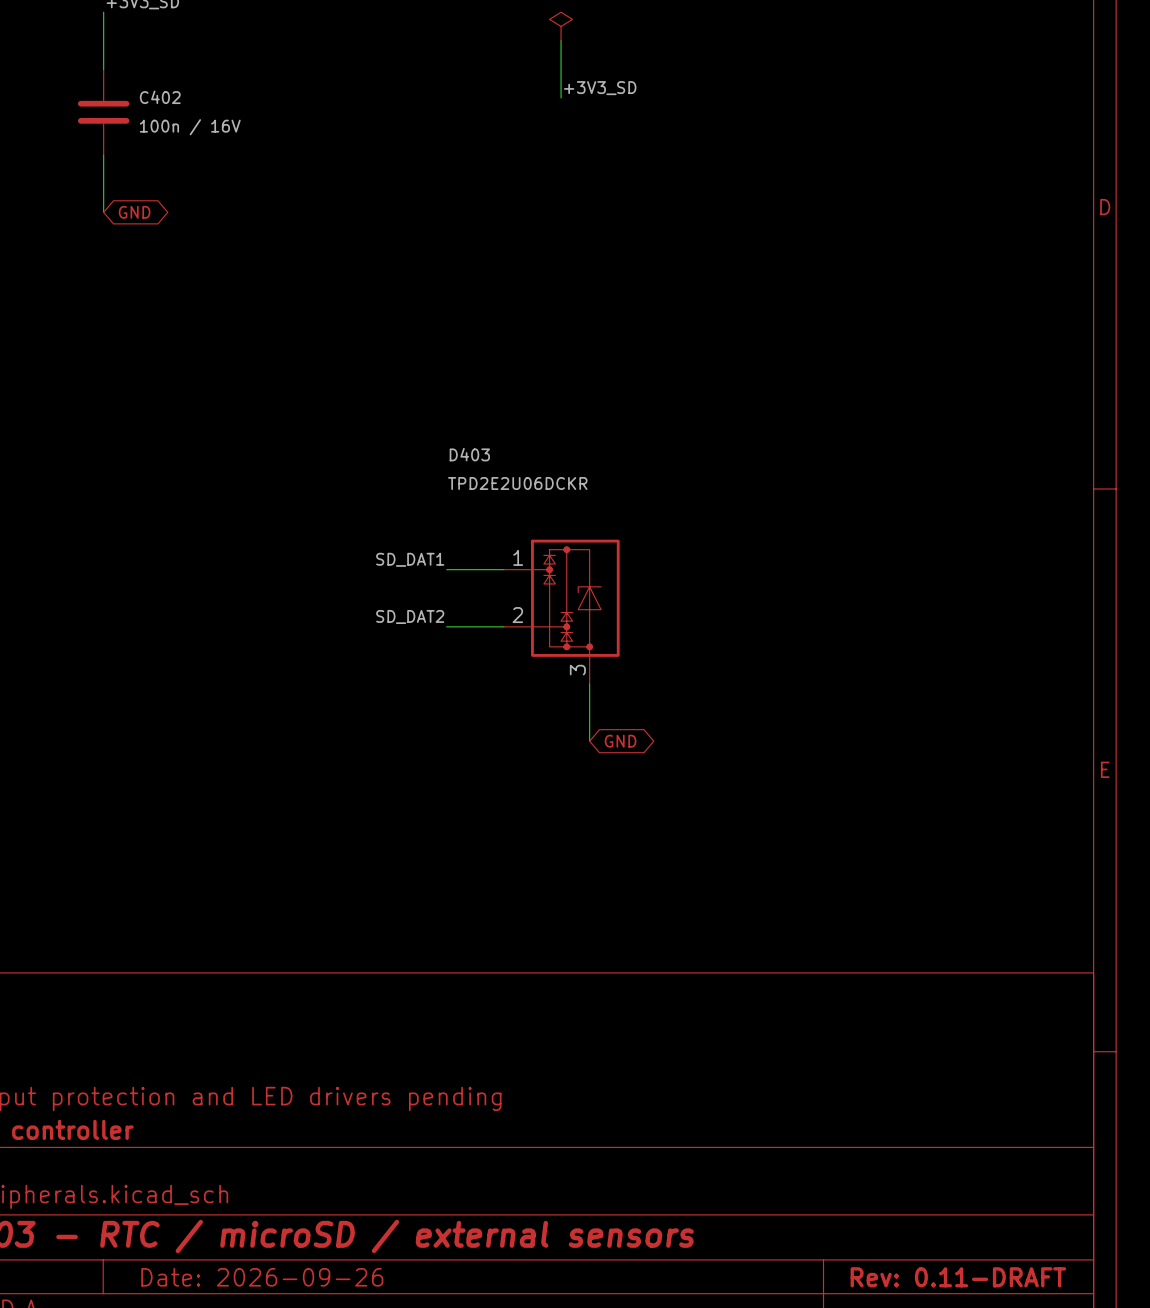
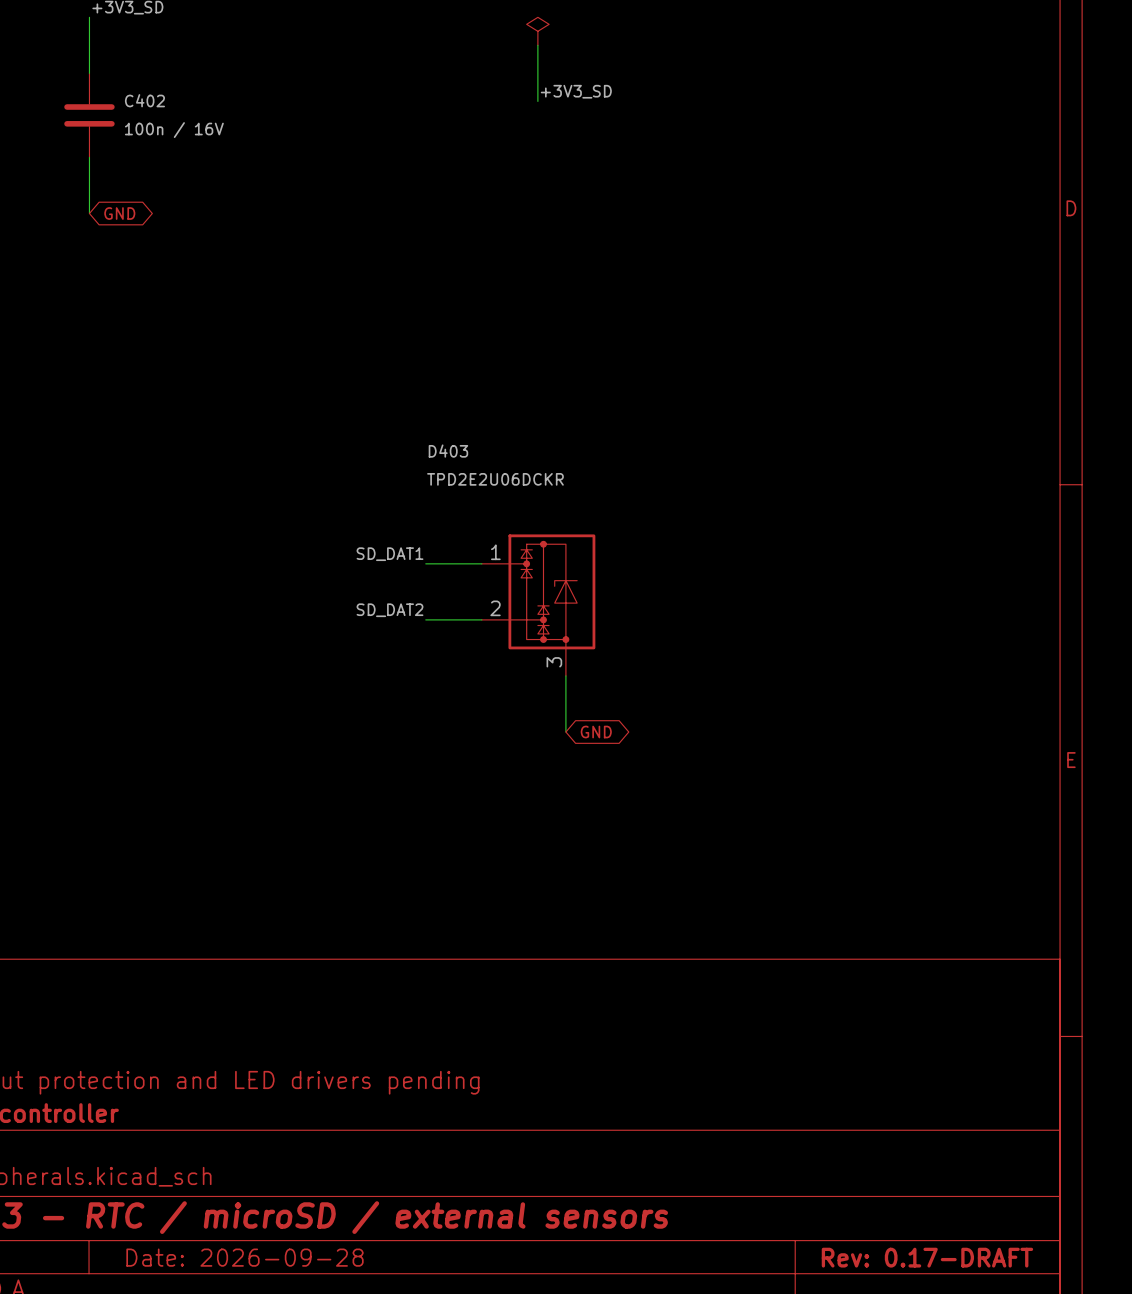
title block: Date: 2026-09-26 (262, 1277) -> Date: 2026-09-28 (245, 1257)
title block: Rev: 0.11-DRAFT (958, 1277) -> Rev: 0.17-DRAFT (927, 1257)

